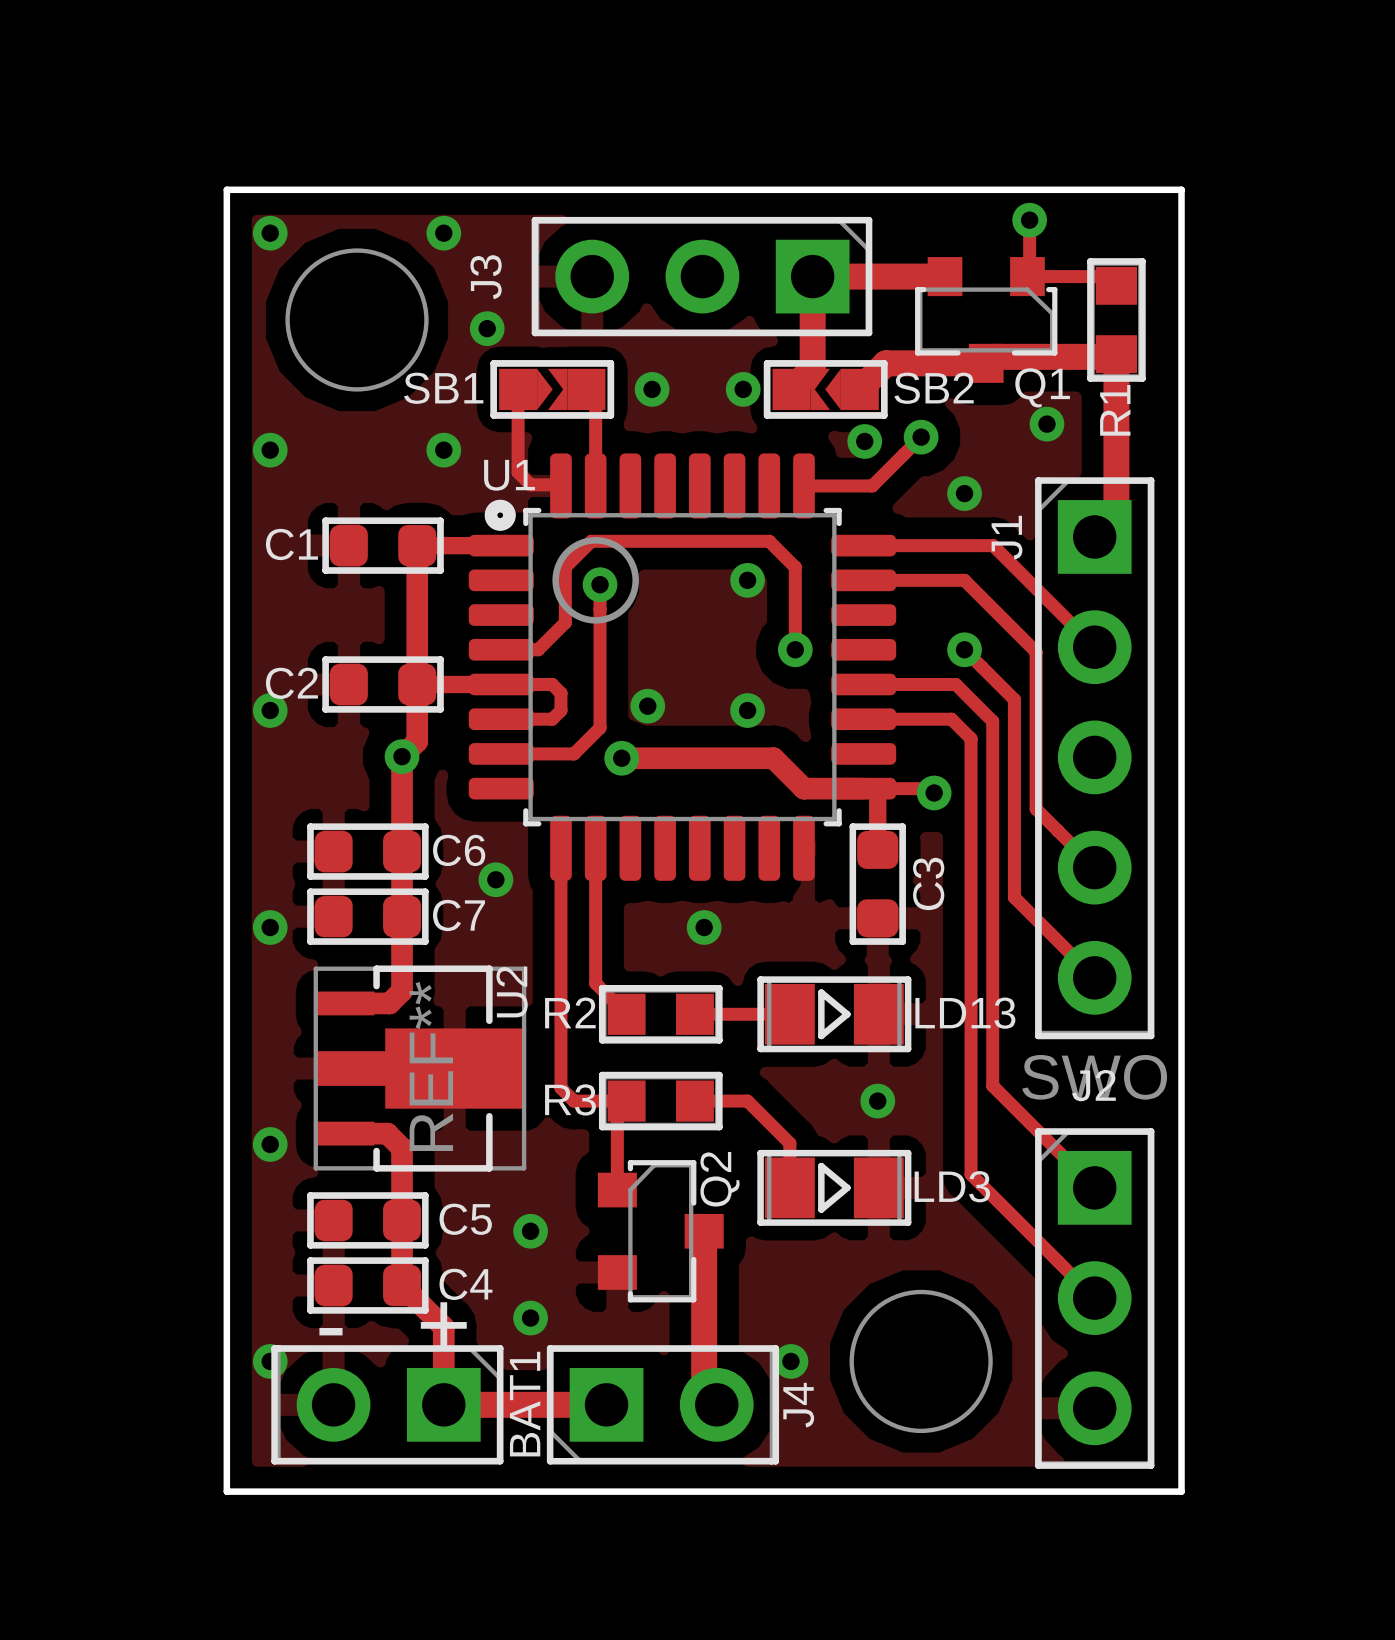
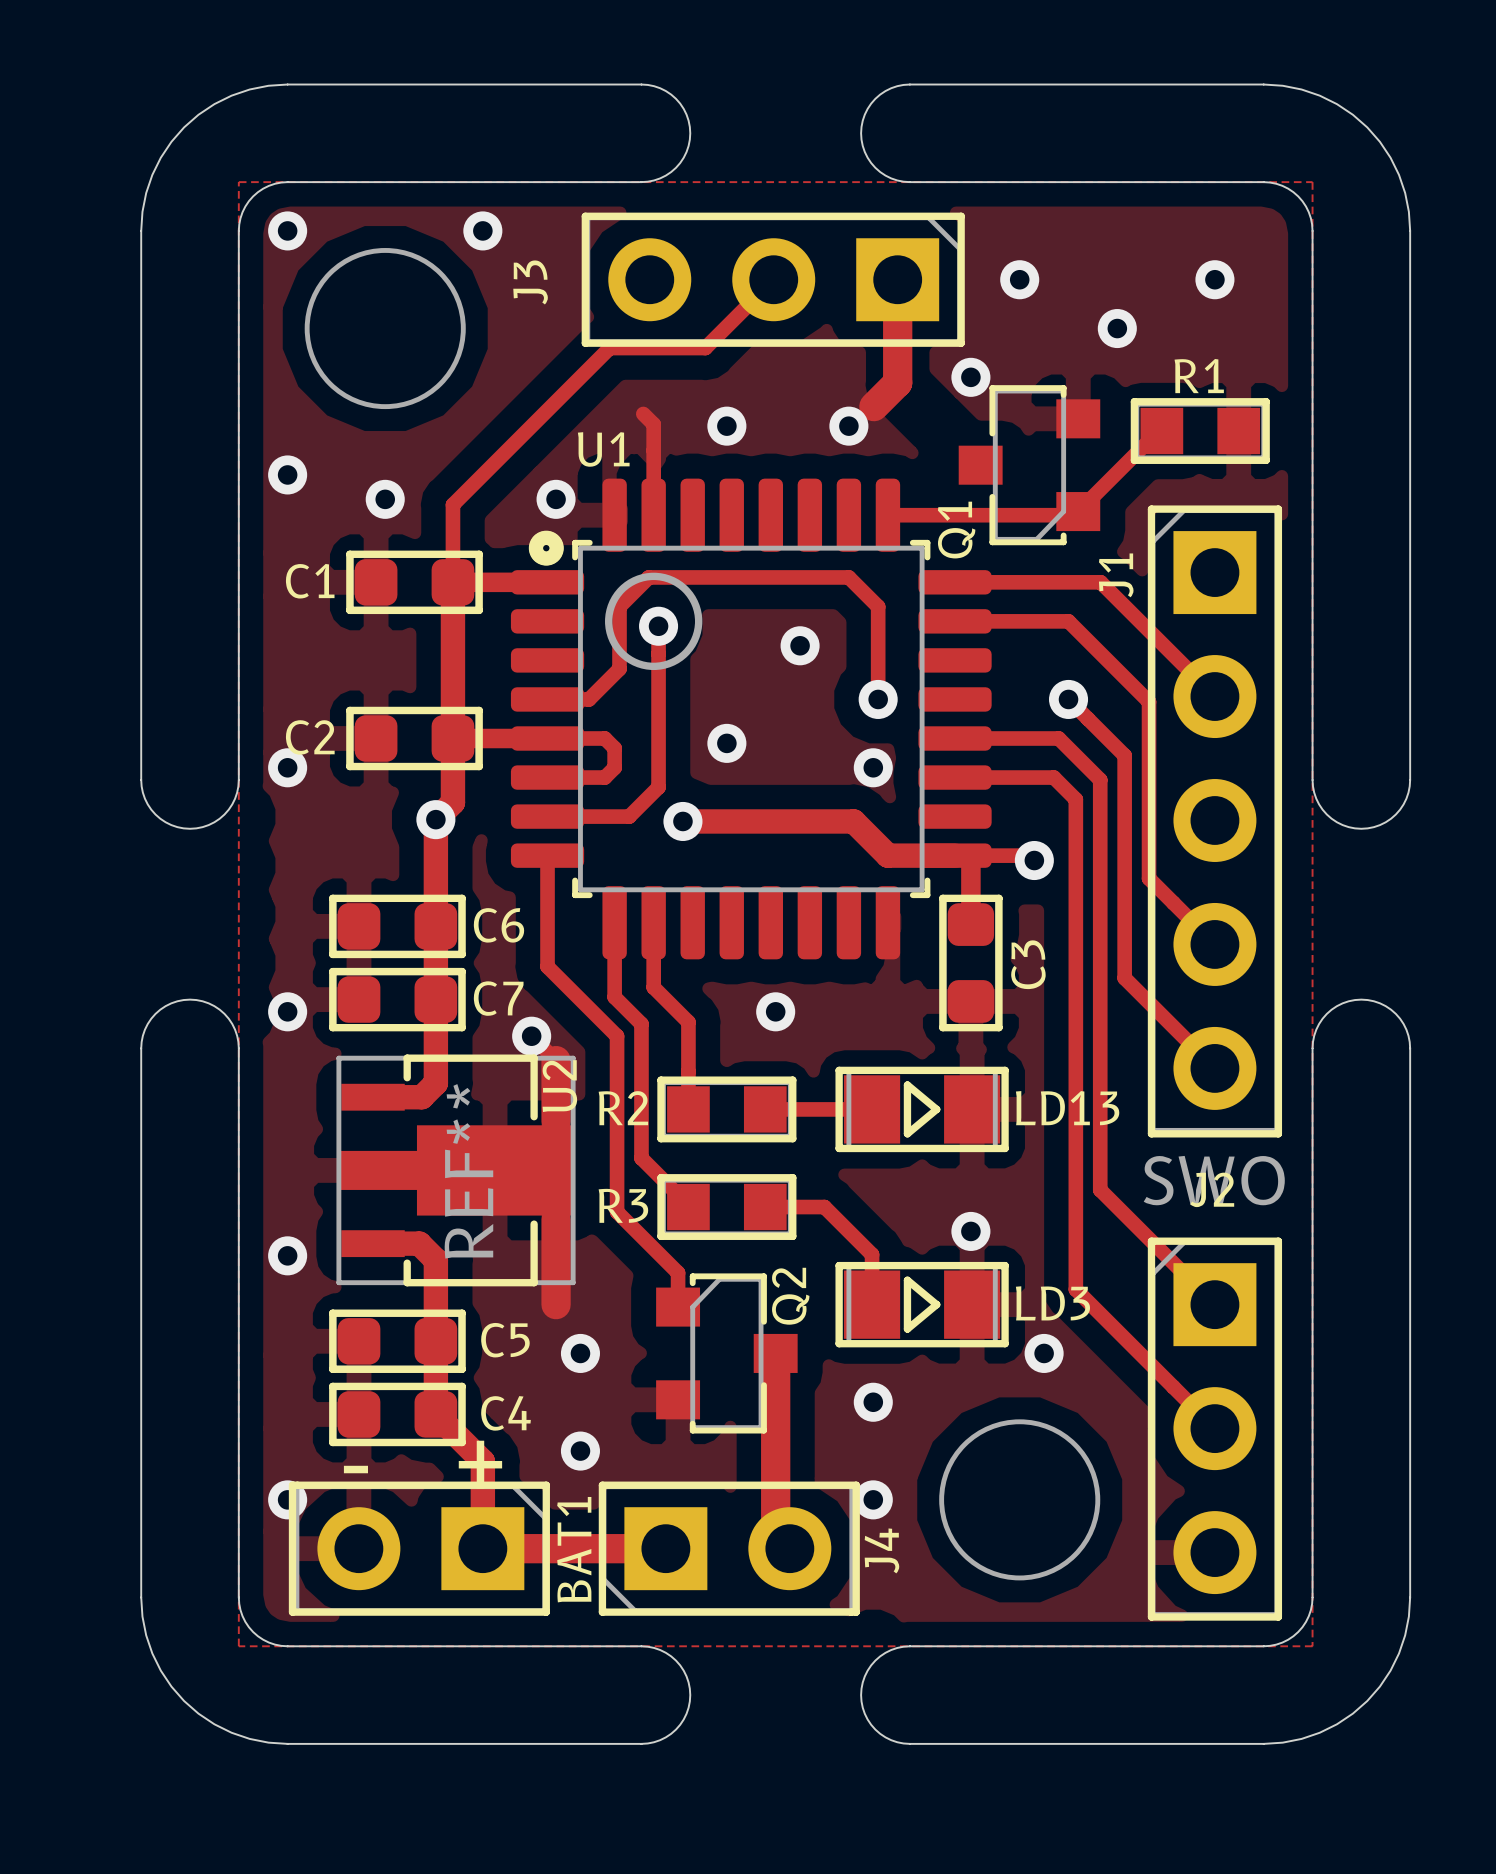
board edge: (270, 189) (226, 189) (226, 233) -> (287, 182) (268, 185) (253, 196) (242, 212) (238, 230)
board edge width: thick (270, 189) (584, 189) -> thin (287, 182) (641, 182)
board edge: (584, 189) (823, 189) -> (641, 182) (660, 178) (675, 167) (686, 151) (690, 133) (686, 114) (680, 103) (665, 91) (647, 84) (268, 85) (249, 89) (214, 104) (198, 114) (171, 141) (160, 157) (146, 193) (141, 230) (141, 786) (147, 804) (160, 818) (171, 825) (190, 828) (208, 825) (224, 814) (235, 798) (238, 779)
board edge width: thick (823, 189) (1138, 189) -> thin (909, 182) (1263, 182)
board edge: (1138, 189) (1181, 189) (1181, 233) -> (1263, 182) (1282, 185) (1298, 196) (1308, 212) (1312, 230)
track: (1029, 220) (1029, 274) (1027, 276) (1107, 276) (1116, 285) -> none
via: (1029, 220) -> none
board edge width: thick (226, 233) (226, 721) -> thin (238, 230) (238, 779)
board edge width: thick (1181, 233) (1181, 721) -> thin (1312, 230) (1312, 779)
track: none -> (773, 279) (705, 348) (609, 348) (452, 504) (452, 582)
track: (812, 276) (945, 276) -> none
via: none -> (1019, 279)
via: none -> (1214, 279)
Q1 rotation: 0° (986, 319) -> 90° clockwise (1029, 465)
Q1 position: (986, 319) -> (1029, 465)
via: none -> (1117, 328)
R1 rotation: 0° (1116, 319) -> 90° clockwise (1200, 431)
R1 position: (1116, 319) -> (1200, 431)
via: (487, 328) -> none
via: none -> (970, 377)
SB1: (552, 389) -> none
via position: (652, 389) -> (726, 426)
via position: (743, 389) -> (848, 426)
SB2: (825, 389) -> none
track: (859, 389) (885, 363) (986, 363) (992, 356) (1113, 356) (1116, 354) (1116, 515) (1094, 536) -> none
track: (518, 395) (518, 472) (530, 484) (560, 485) -> none
R1 name position: R1 (1115, 410) -> R1 (1199, 376)
via: (1046, 424) -> none
track: (921, 437) (872, 485) -> (1161, 431) (1158, 431) (1074, 515) (964, 515)
via: (921, 437) -> none
via: (864, 441) -> none
via: (443, 450) -> none
via: none -> (385, 499)
via: none -> (556, 499)
U1 name position: U1 (509, 475) -> U1 (603, 449)
via: (964, 493) -> none
via position: (747, 580) -> (800, 645)
via position: (647, 706) -> (726, 743)
via position: (747, 710) -> (873, 767)
board edge: (226, 721) (226, 960) -> none
board edge: (1181, 721) (1181, 960) -> (1312, 779) (1316, 798) (1326, 814) (1342, 825) (1361, 828) (1380, 825) (1391, 818) (1403, 804) (1409, 786) (1410, 230) (1405, 193) (1390, 157) (1379, 141) (1352, 114) (1336, 104) (1301, 89) (1282, 85) (903, 84) (885, 91) (871, 103) (864, 114) (861, 133) (864, 151) (875, 167) (891, 178) (909, 182)
via position: (495, 879) -> (531, 1036)
track: (595, 905) (595, 983) (626, 1014) -> (653, 987) (688, 1022) (688, 1109)
track: (560, 914) (560, 1088) (573, 1101) (626, 1101) -> (614, 997) (641, 1024) (641, 1158) (688, 1207)
track: none -> (531, 1036) (556, 1060) (556, 1121) (507, 1170)
board edge width: thick (226, 960) (226, 1448) -> thin (238, 1048) (238, 1597)
board edge: none -> (1312, 1048) (1316, 1029) (1326, 1013) (1342, 1003) (1361, 999) (1380, 1003) (1391, 1009) (1403, 1024) (1409, 1042) (1410, 1597) (1405, 1635) (1390, 1670) (1379, 1686) (1352, 1713) (1336, 1724) (1301, 1738) (1282, 1742) (903, 1743) (885, 1737) (871, 1724) (864, 1713) (861, 1695) (864, 1676) (875, 1660) (891, 1650) (909, 1646)
board edge width: thick (1181, 960) (1181, 1448) -> thin (1312, 1048) (1312, 1597)
track: none -> (507, 1170) (556, 1219) (556, 1304)
via position: (877, 1101) -> (970, 1231)
track: (617, 1110) (617, 1159) -> (547, 855) (547, 966) (617, 1036) (617, 1211) (678, 1272)
via: none -> (1044, 1353)
via: none -> (873, 1402)
board edge: (226, 1448) (226, 1491) (270, 1491) -> (238, 1597) (242, 1616) (253, 1631) (268, 1642) (287, 1646)
board edge: (1181, 1448) (1181, 1491) (1138, 1491) -> (1312, 1597) (1308, 1616) (1298, 1631) (1282, 1642) (1263, 1646)
board edge width: thick (270, 1491) (584, 1491) -> thin (287, 1646) (641, 1646)
board edge: (584, 1491) (823, 1491) -> (641, 1646) (660, 1650) (675, 1660) (686, 1676) (690, 1695) (686, 1713) (680, 1724) (665, 1737) (647, 1743) (268, 1742) (249, 1738) (214, 1724) (198, 1713) (171, 1686) (160, 1670) (146, 1635) (141, 1597) (141, 1042) (147, 1024) (160, 1009) (171, 1003) (190, 999) (208, 1003) (224, 1013) (235, 1029) (238, 1048)
board edge width: thick (823, 1491) (1138, 1491) -> thin (909, 1646) (1263, 1646)

